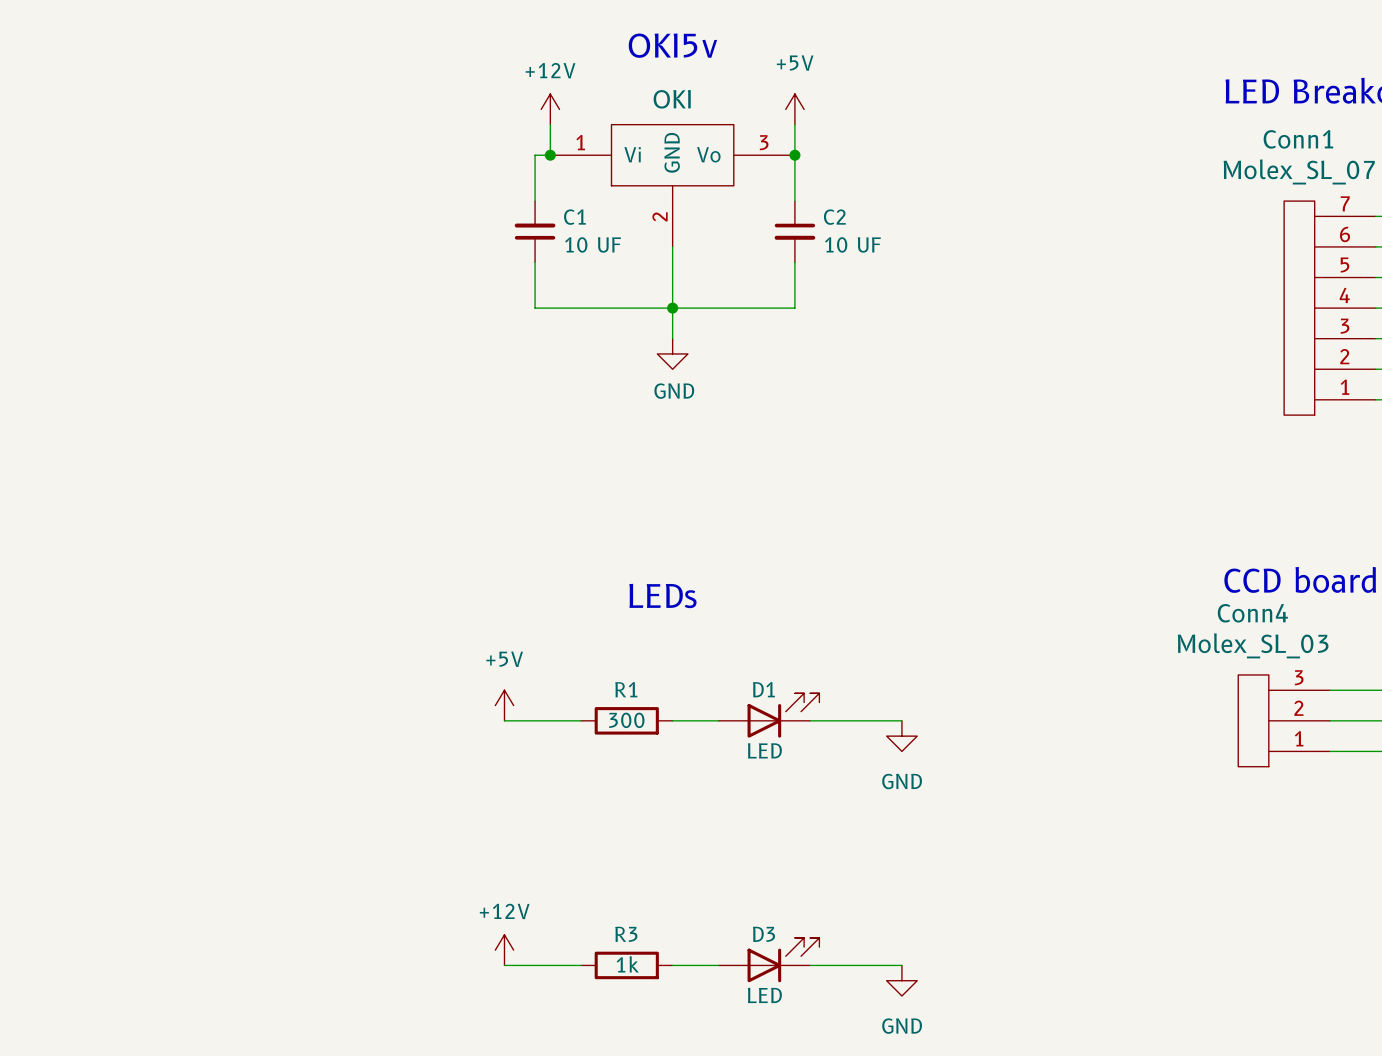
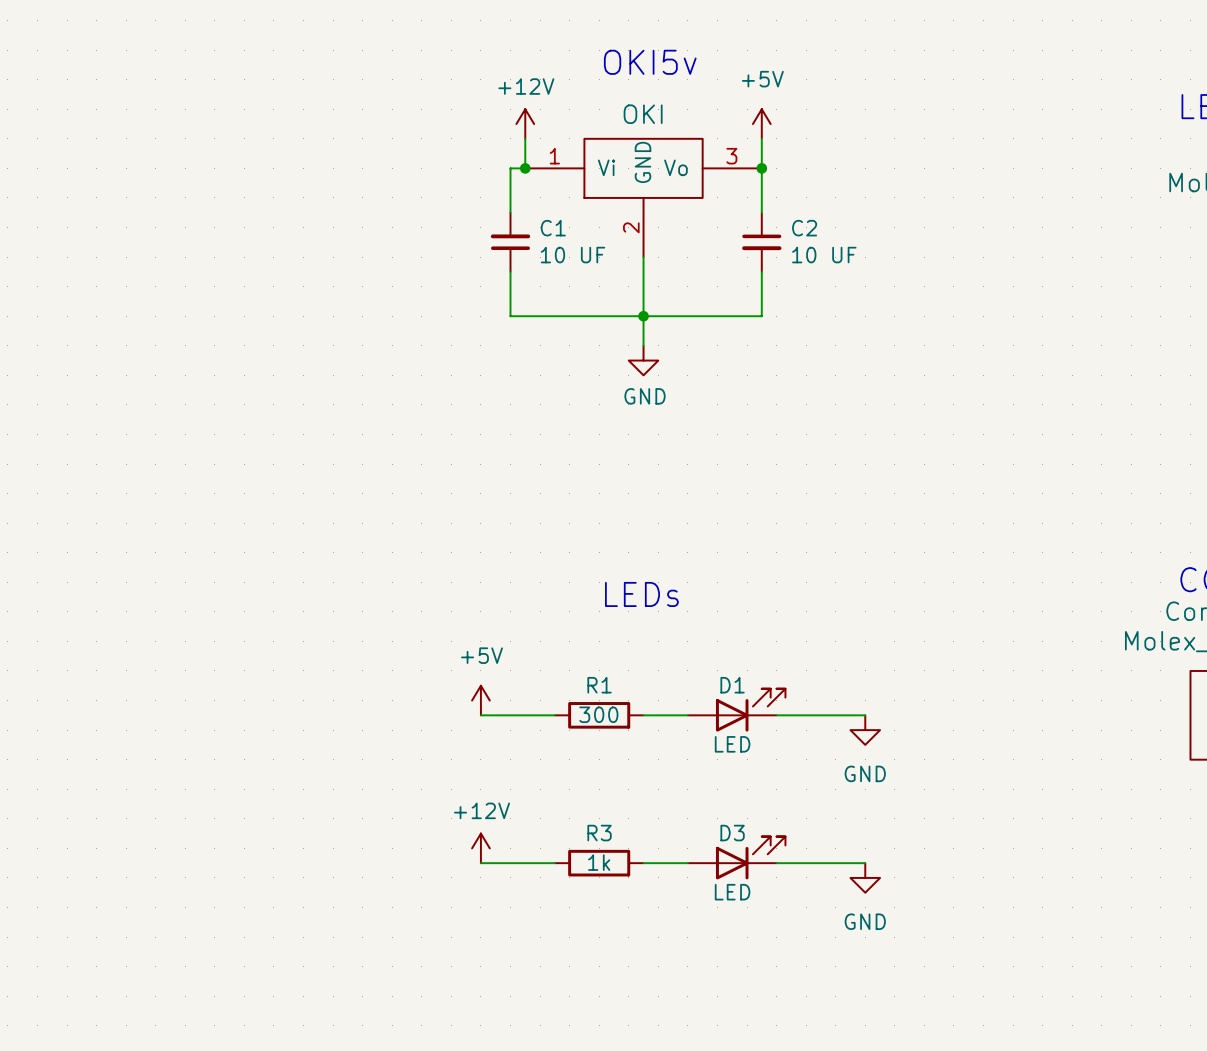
power symbol position: +12V (504, 950) -> +12V (480, 848)
D3 position: (768, 960) -> (736, 857)
wire: (504, 965) (580, 965) -> (480, 863) (554, 863)
R3 position: (626, 965) -> (599, 863)
wire: (672, 965) (718, 965) -> (643, 863) (687, 863)
wire: (810, 965) (901, 965) -> (776, 863) (865, 863)
power symbol position: GND (901, 980) -> GND (865, 877)

